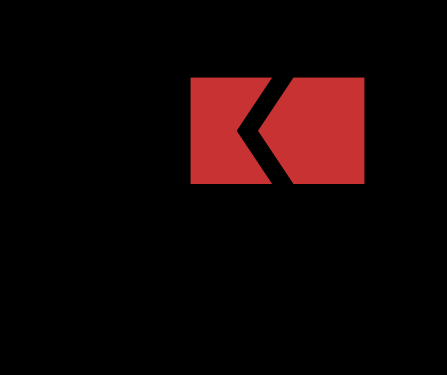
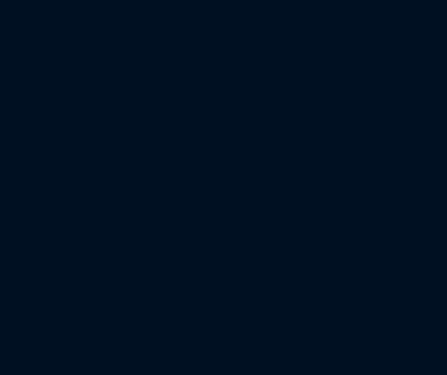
part: (277, 130) -> none

